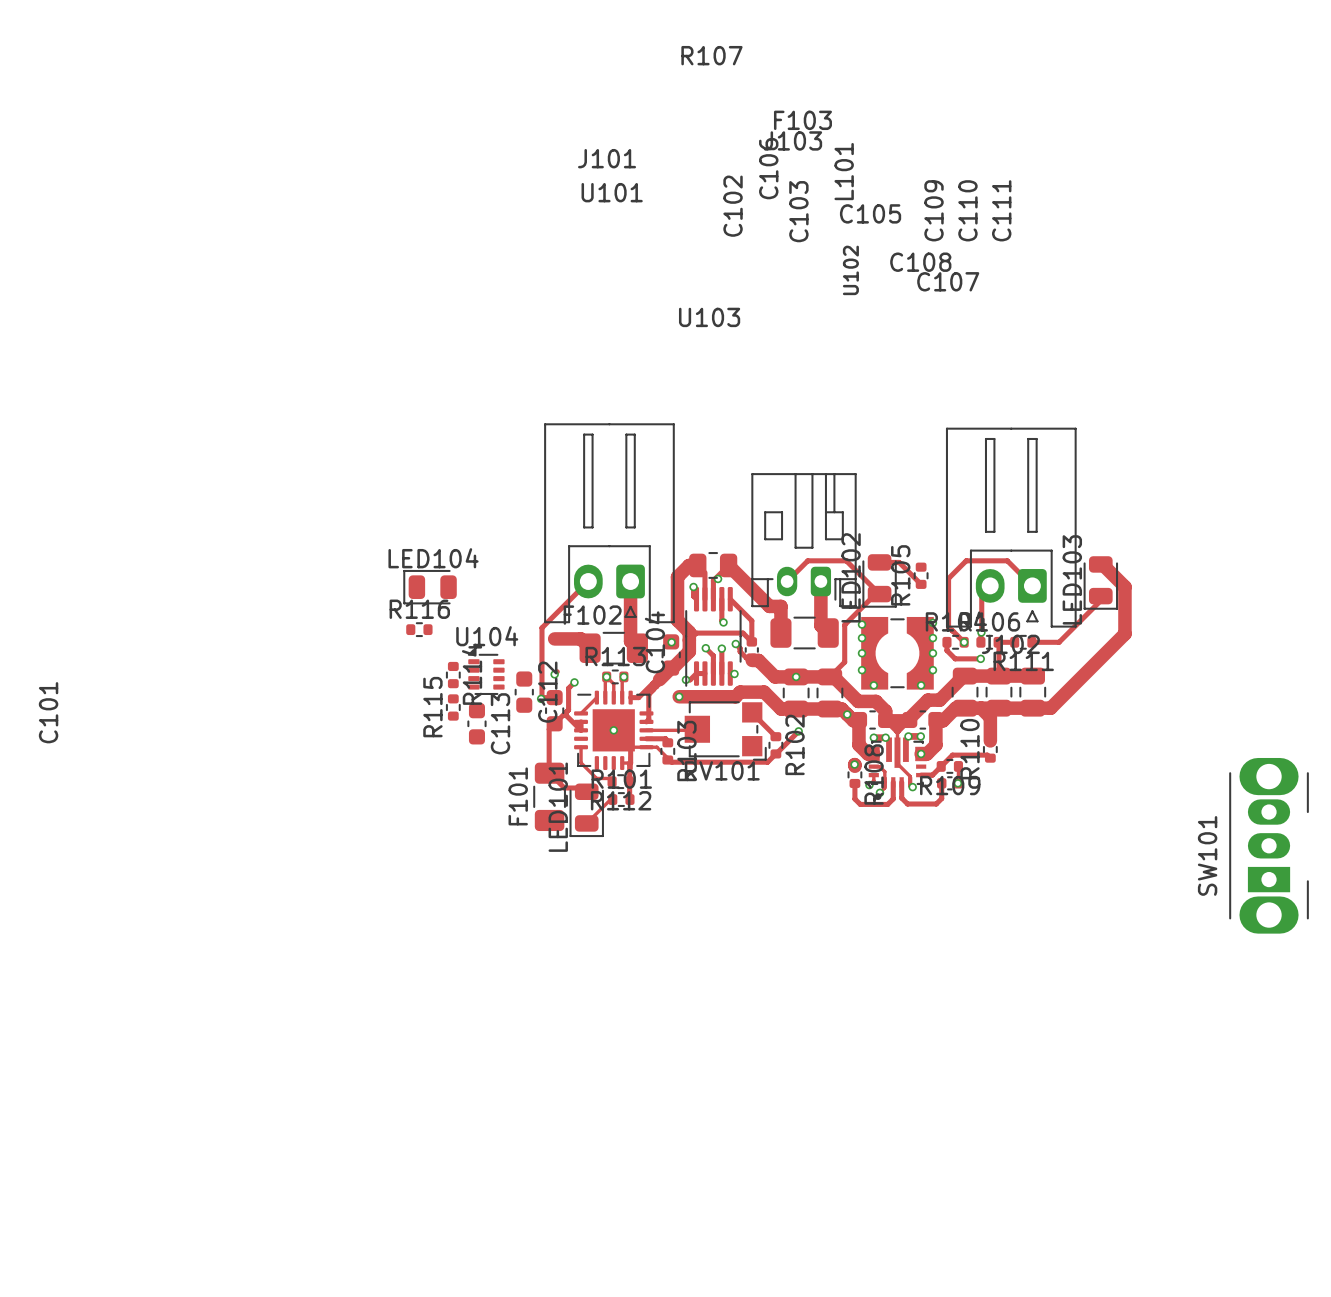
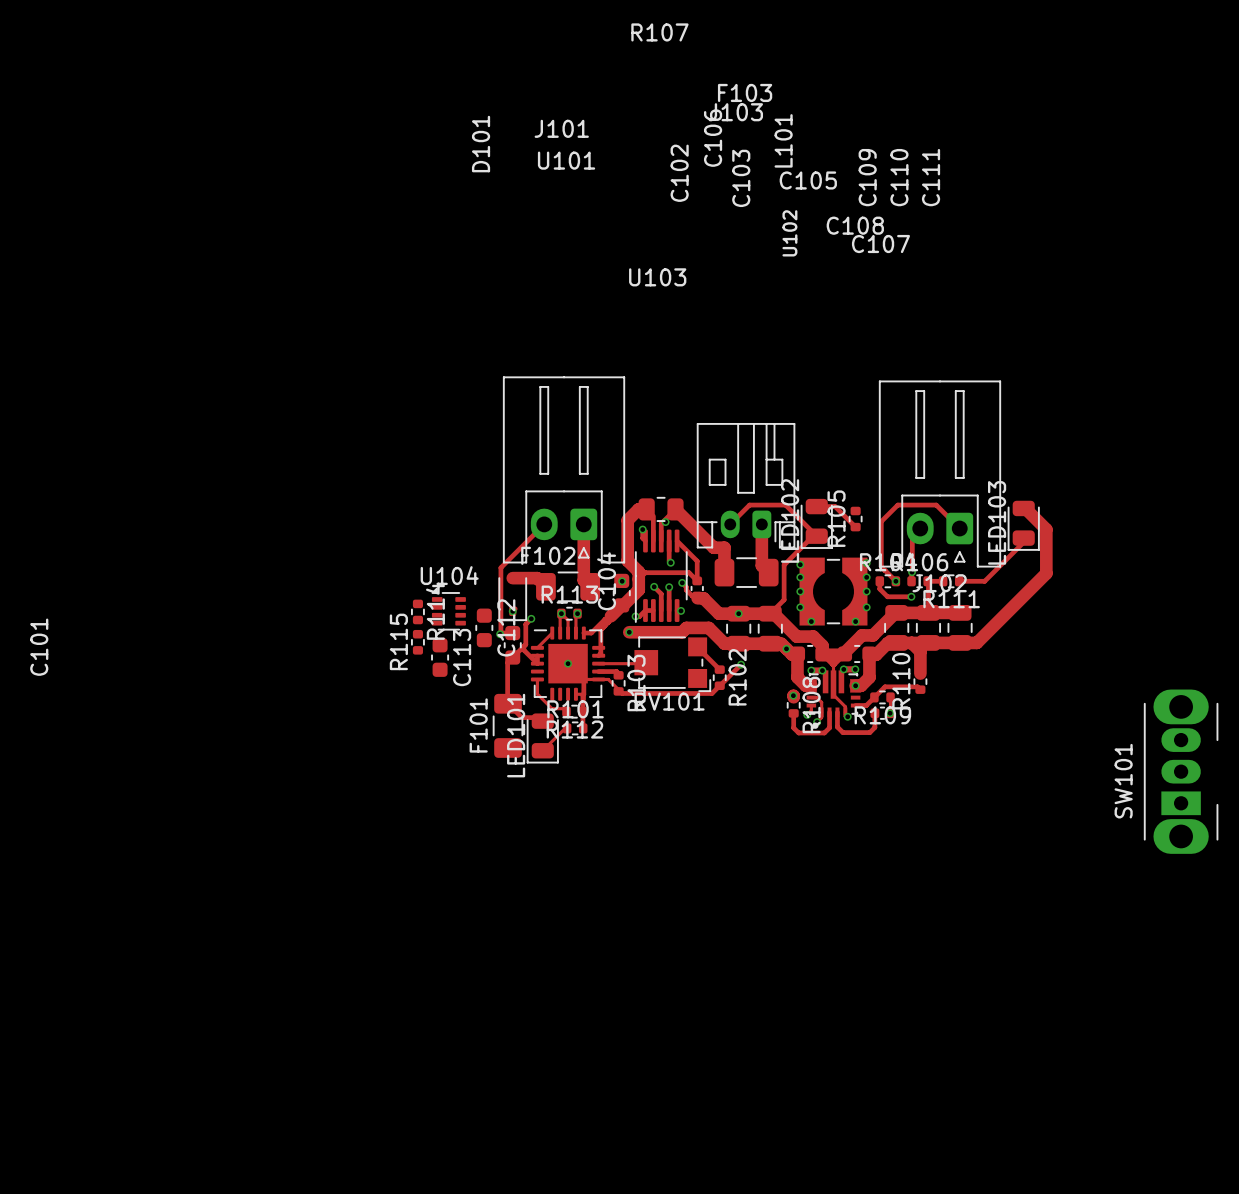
LED104: (430, 587) -> none
R116: (419, 629) -> none
D101: none -> (512, 597)

